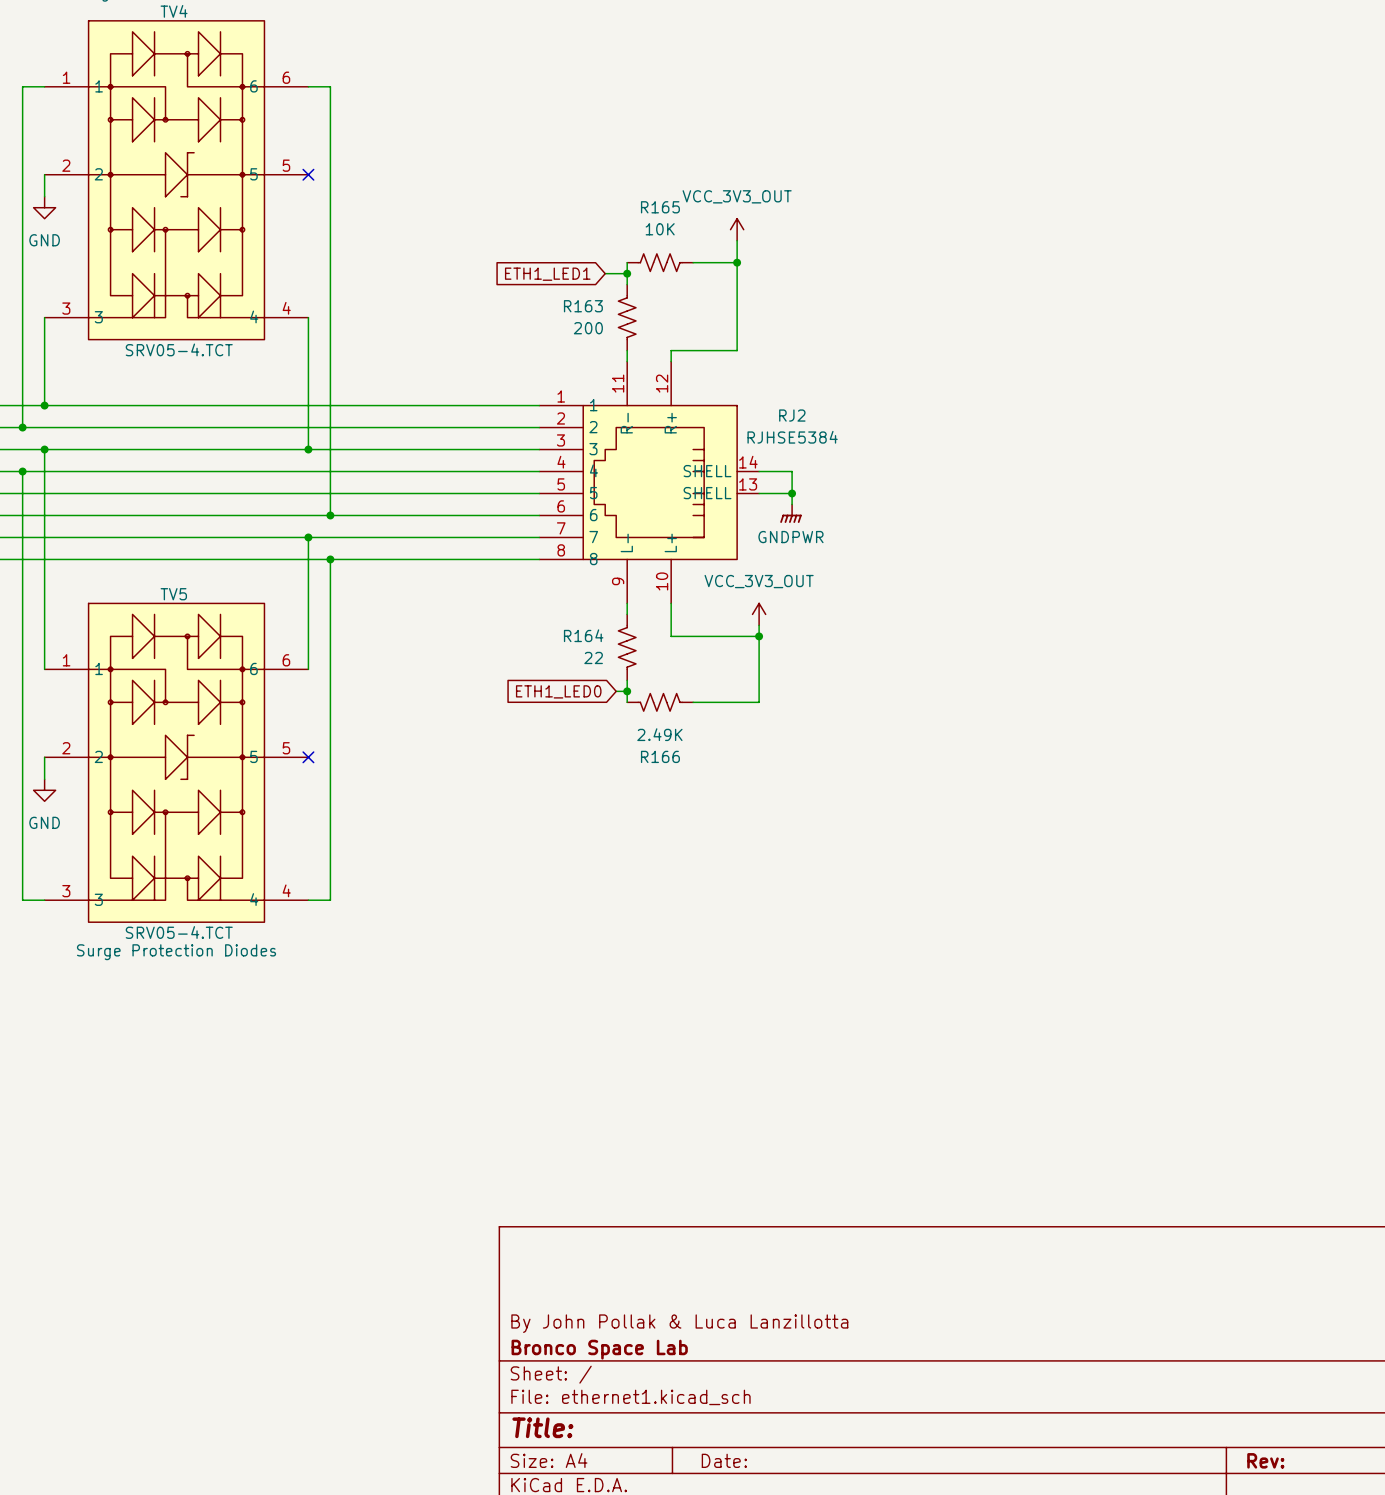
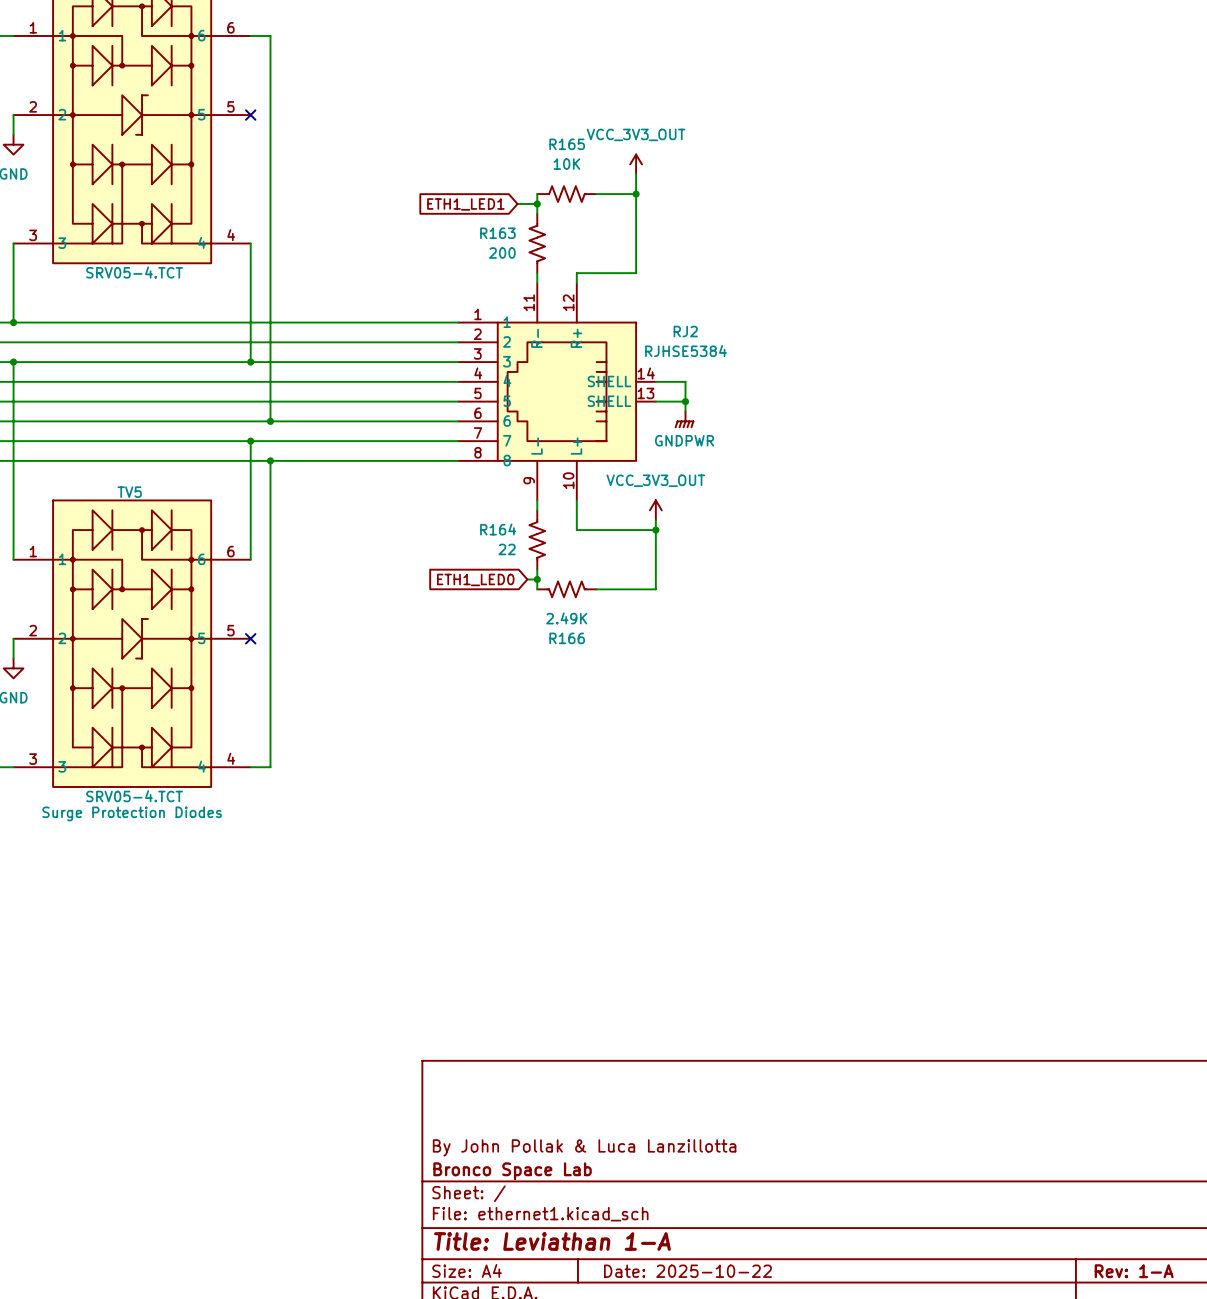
title block: Title: (542, 1427) -> Title: Leviathan 1-A (552, 1241)
title block: Date: (724, 1460) -> Date: 2025-10-22 (687, 1271)
title block: Rev: (1265, 1460) -> Rev: 1-A (1134, 1271)

